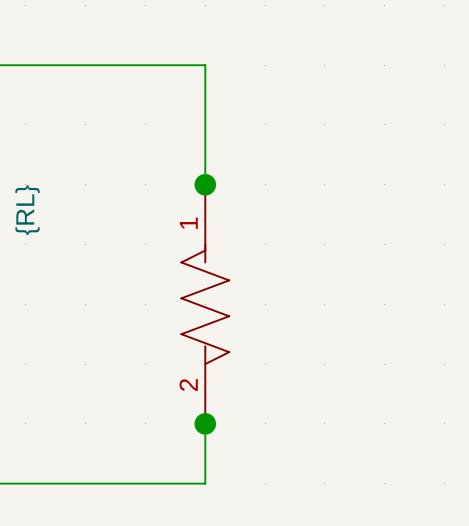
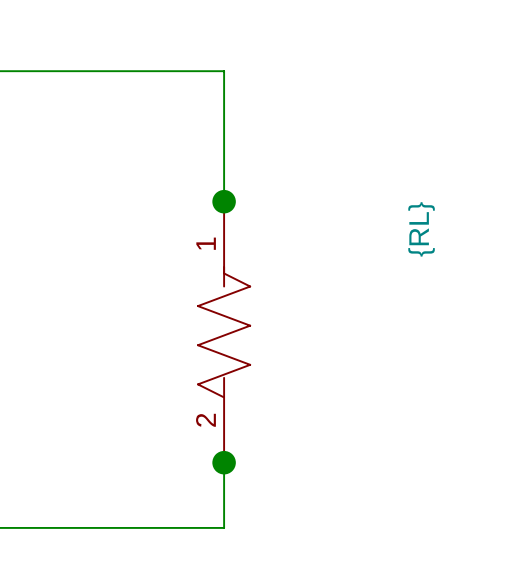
part flip: as is (205, 304) -> left-right (224, 332)

